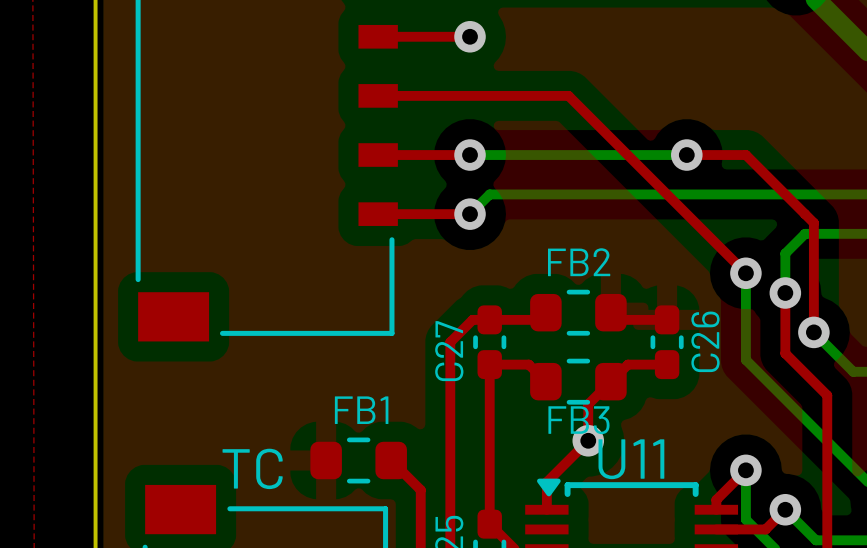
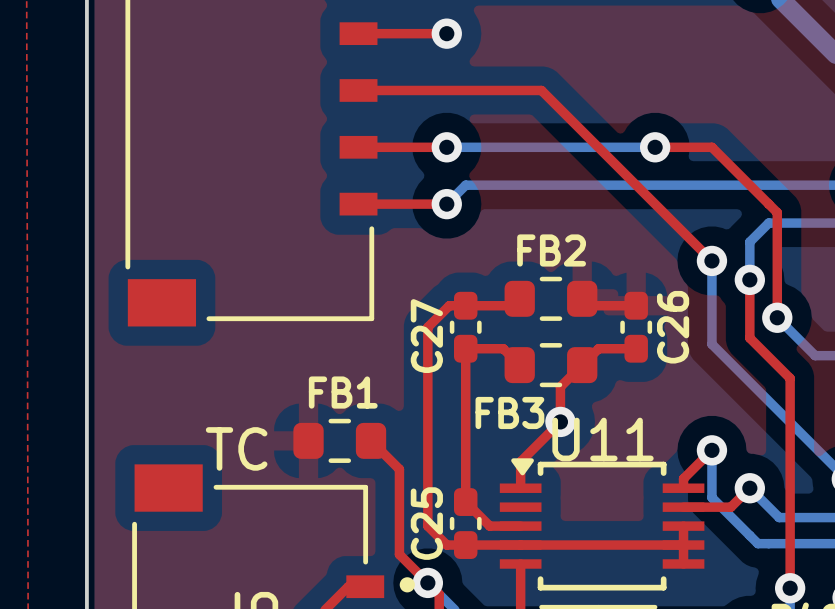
FB3 name position: FB3 (578, 420) -> FB3 (509, 412)

